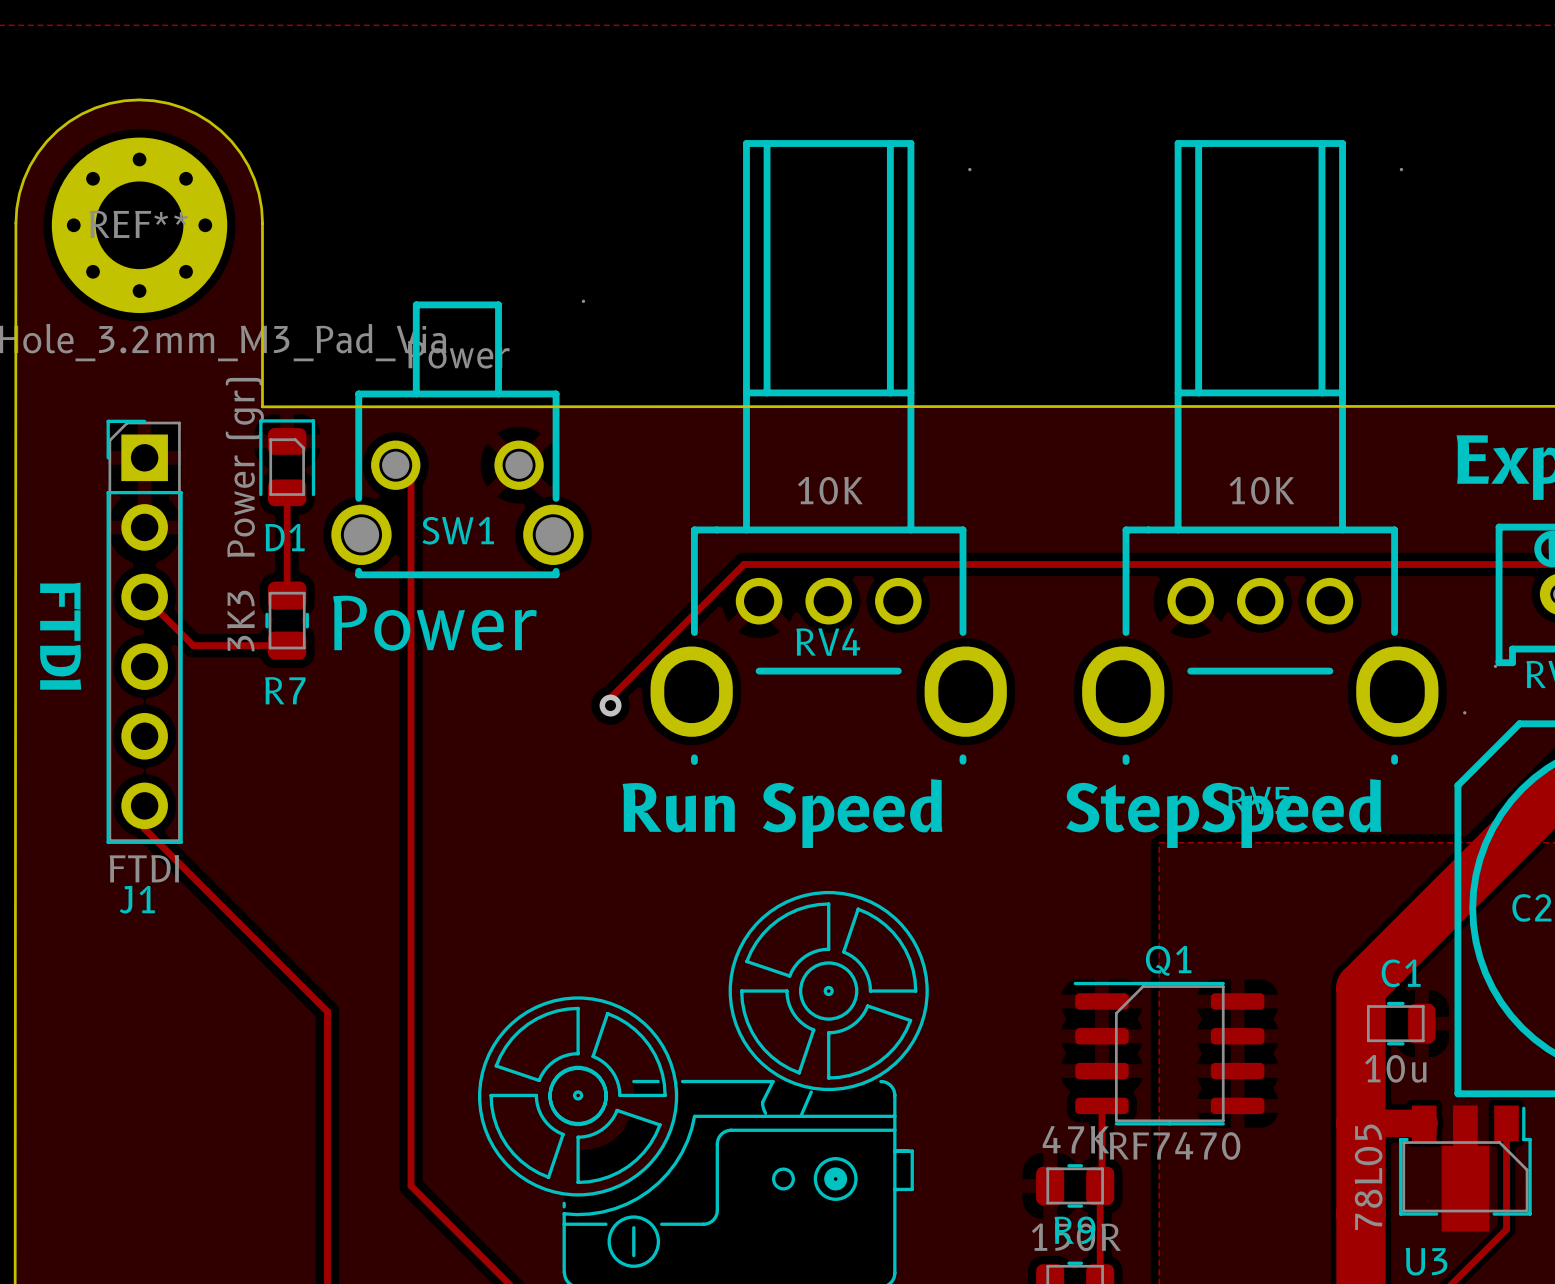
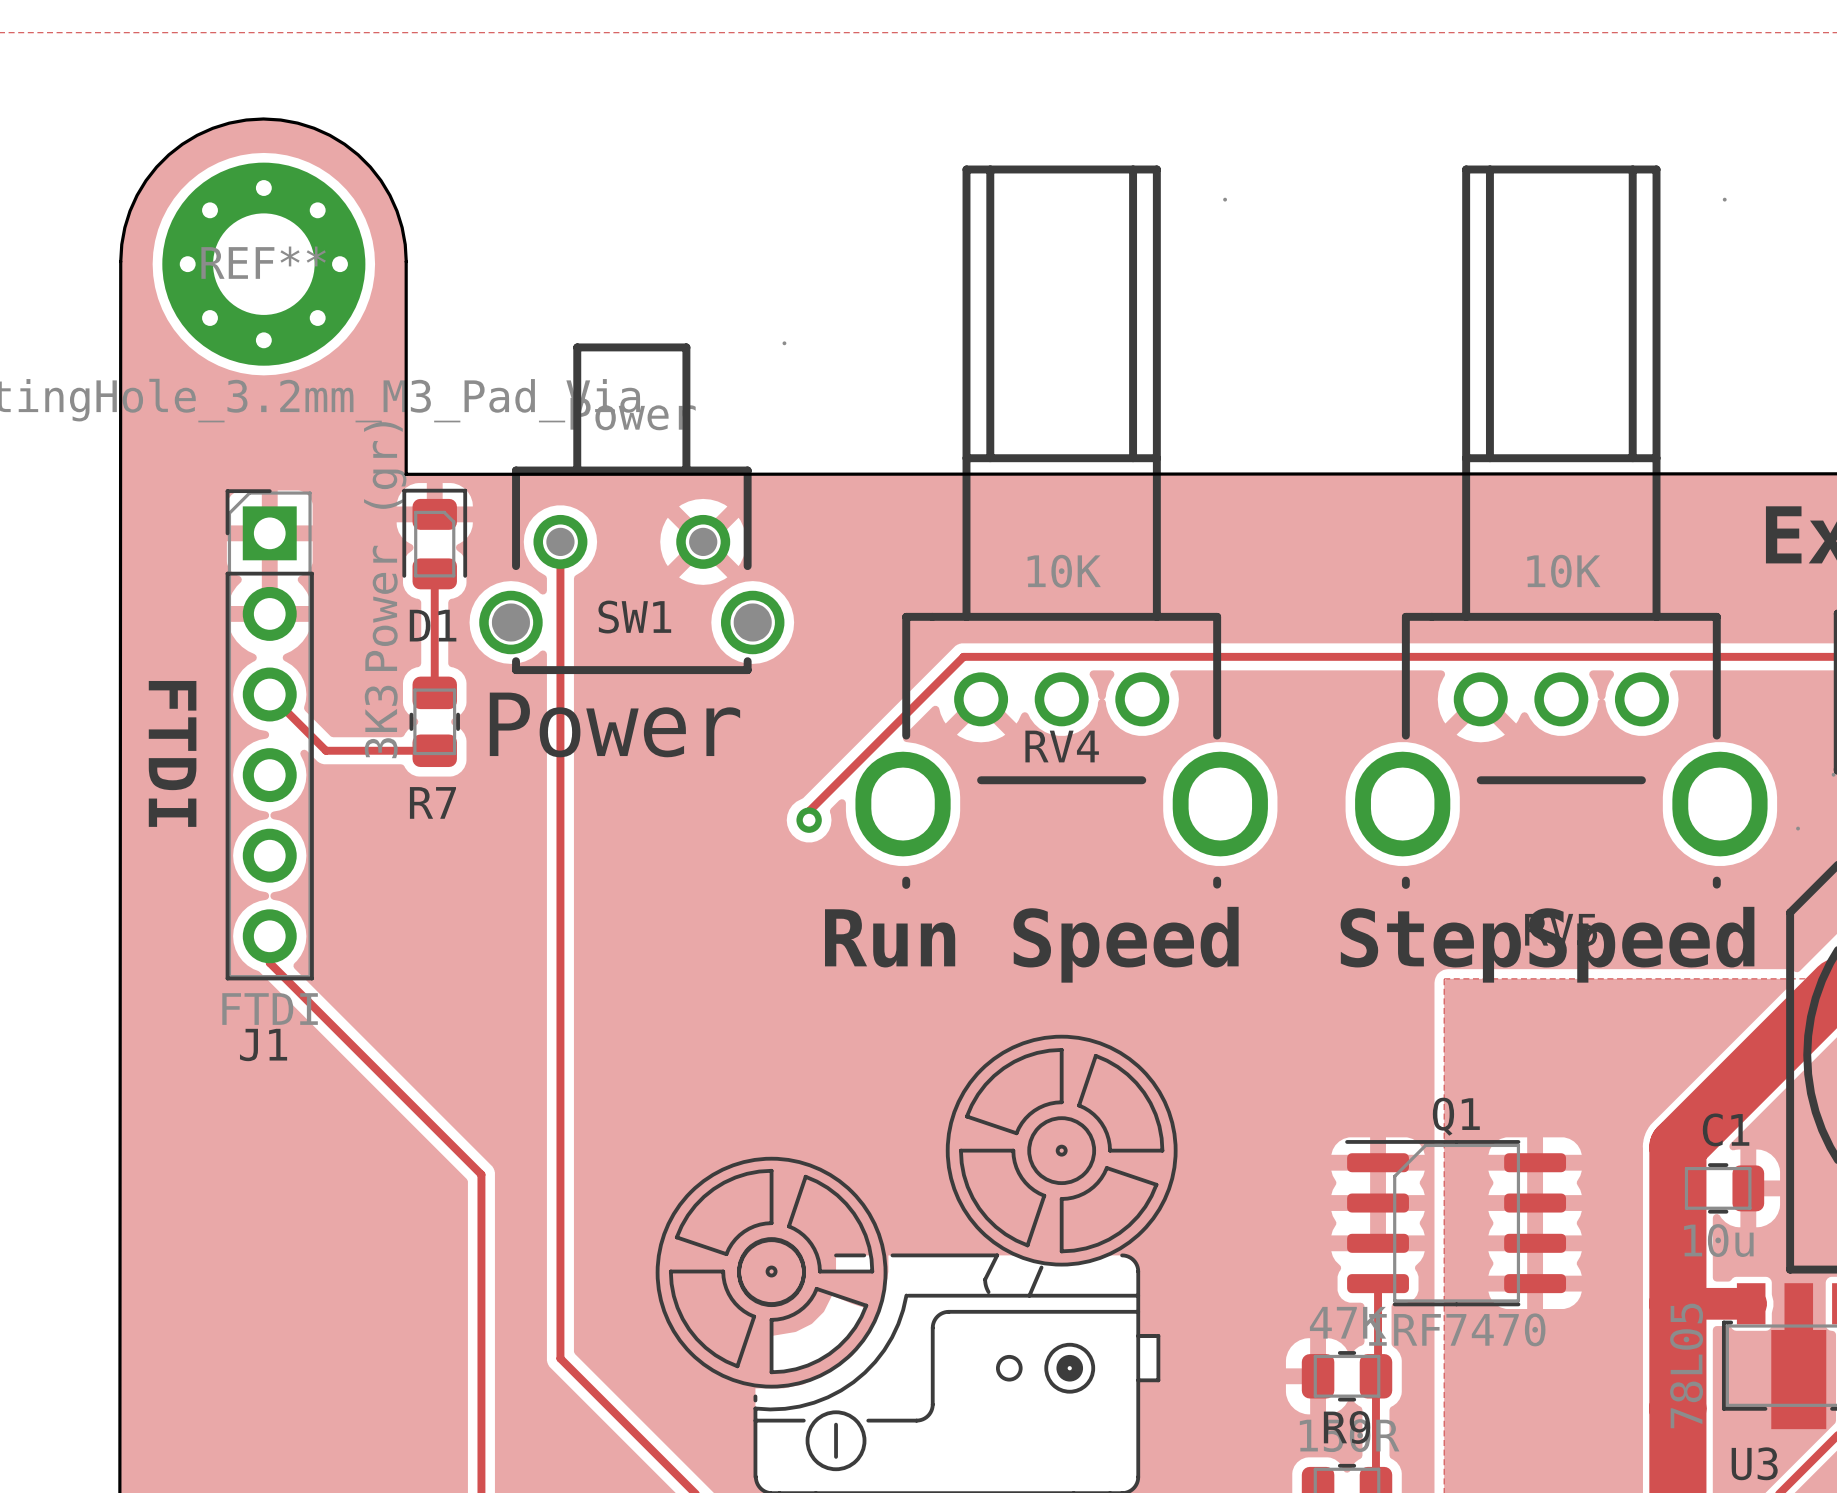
SW1 footprint: [331, 299, 586, 579] -> [479, 341, 787, 675]
track: (395, 465) (411, 480) (411, 1185) -> (560, 541) (560, 1358) (578, 1376)

